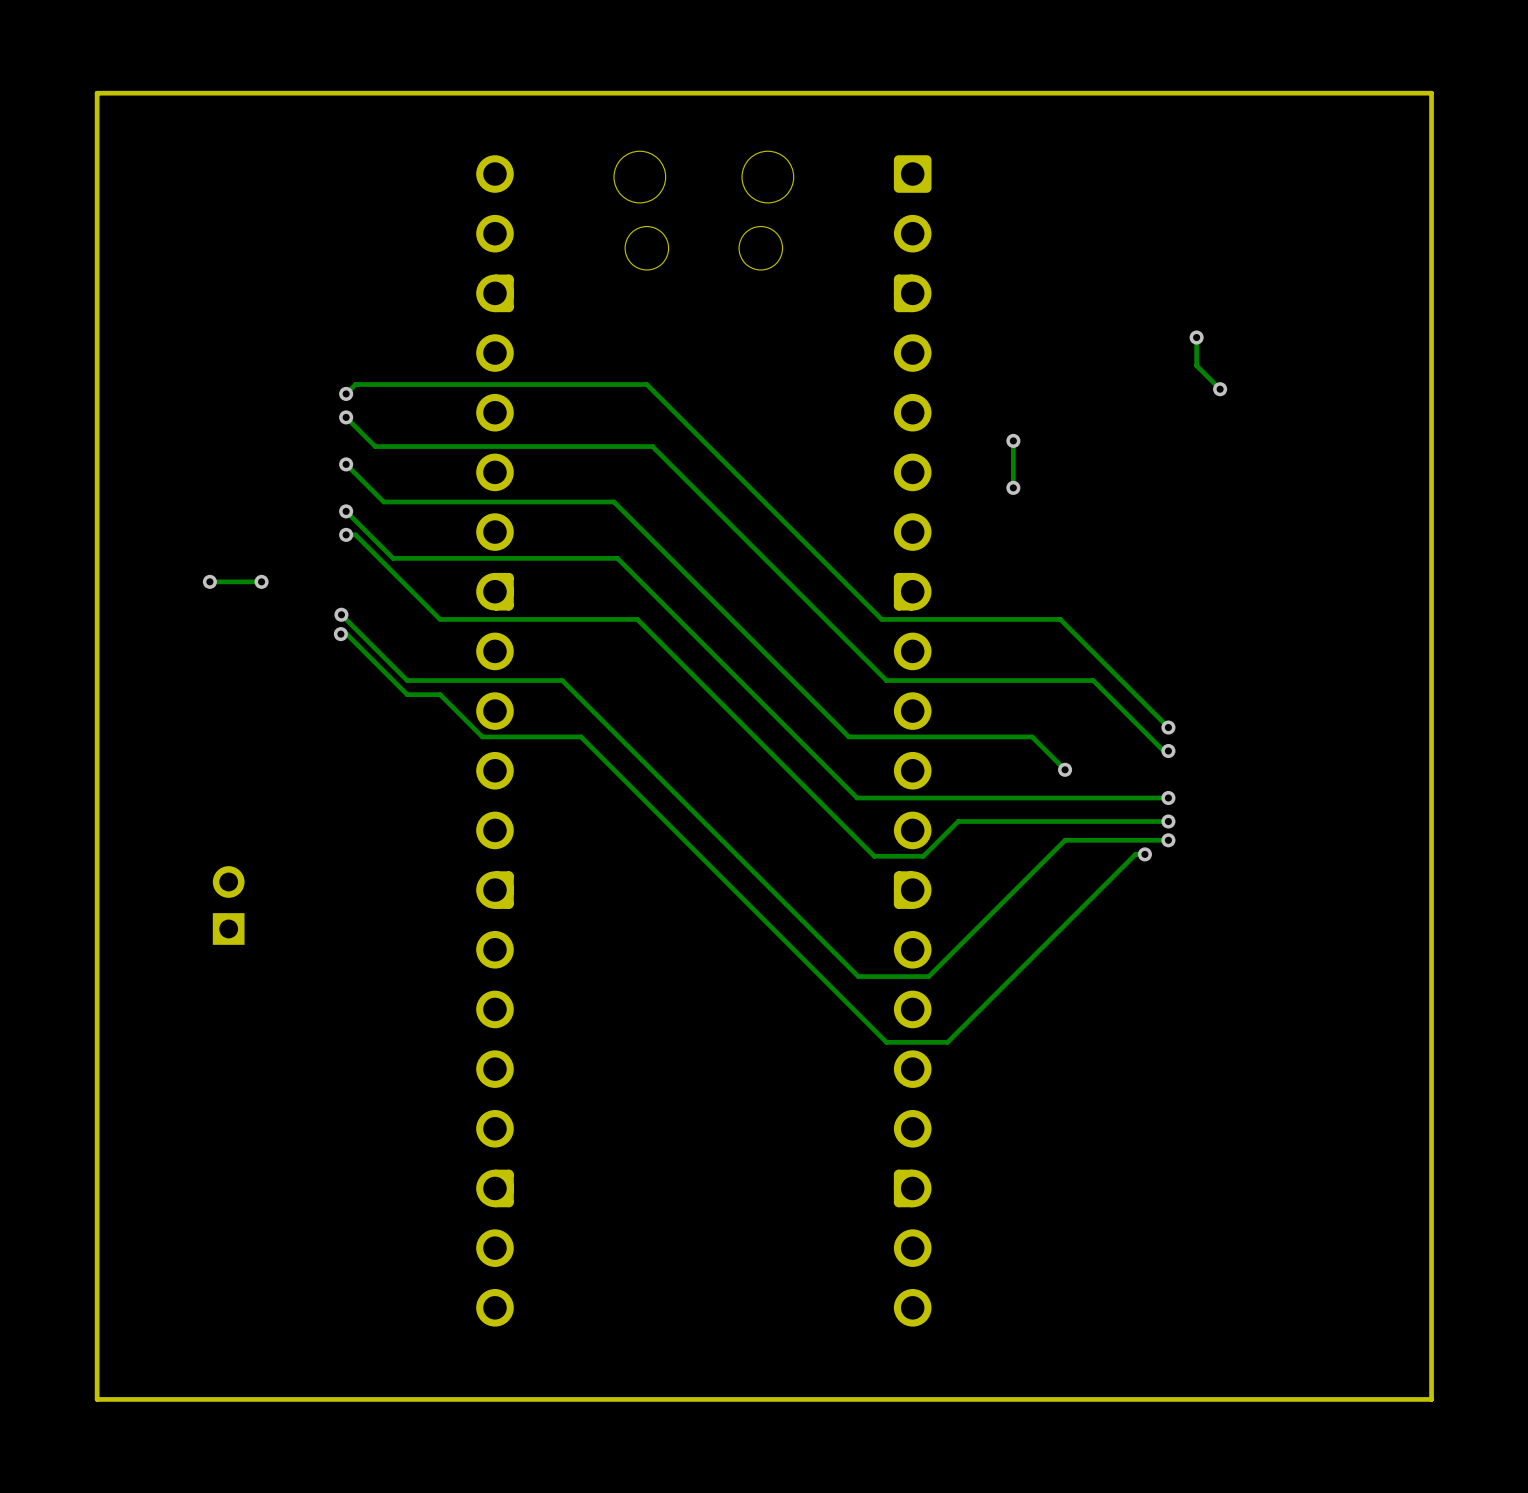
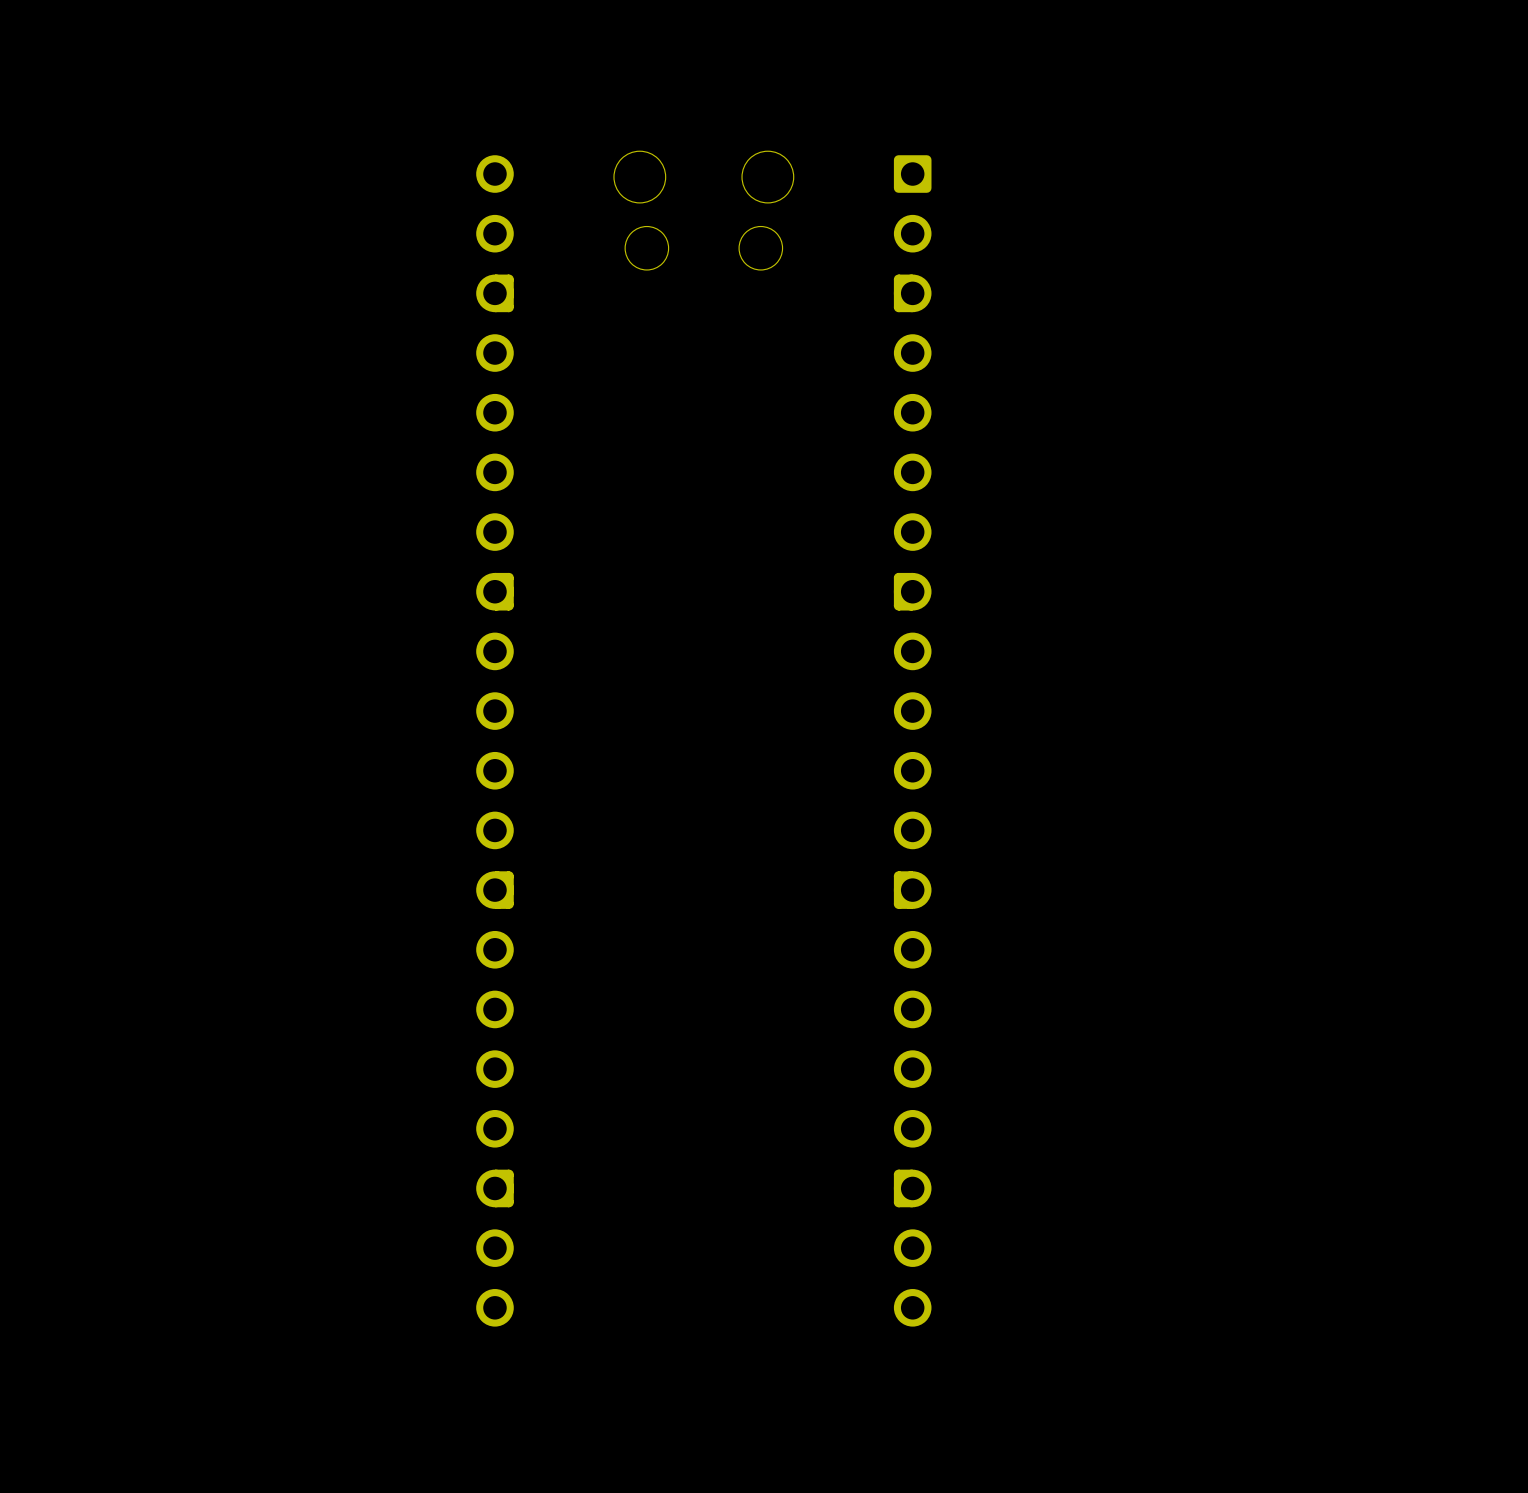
board edge: (1431, 93) (97, 93) (97, 1399) (1431, 1399) (1431, 93) -> none
track: (1196, 337) (1196, 365) (1220, 389) -> none
via: (1196, 337) -> none
via: (1220, 389) -> none
track: (346, 393) (355, 384) (646, 384) (881, 619) (1060, 619) (1168, 727) -> none
via: (346, 393) -> none
track: (346, 417) (375, 446) (652, 446) (886, 680) (1093, 680) (1163, 751) (1168, 751) -> none
via: (346, 417) -> none
track: (1013, 440) (1013, 487) -> none
via: (1013, 440) -> none
track: (346, 464) (383, 501) (613, 501) (848, 736) (1032, 736) (1065, 769) -> none
via: (346, 464) -> none
via: (1013, 487) -> none
track: (346, 511) (393, 558) (617, 558) (857, 798) (1168, 798) -> none
via: (346, 511) -> none
track: (346, 534) (355, 534) (440, 619) (637, 619) (874, 856) (923, 856) (958, 821) (1168, 821) -> none
via: (346, 534) -> none
via: (209, 581) -> none
track: (261, 581) (209, 581) -> none
via: (261, 581) -> none
track: (341, 614) (407, 680) (562, 680) (858, 976) (928, 976) (1065, 840) (1168, 840) -> none
via: (341, 614) -> none
track: (340, 634) (346, 633) (407, 694) (440, 694) (482, 736) (581, 736) (886, 1042) (947, 1042) (1135, 854) (1144, 854) -> none
via: (340, 634) -> none
via: (1168, 727) -> none
via: (1168, 751) -> none
via: (1065, 769) -> none
via: (1168, 798) -> none
via: (1168, 821) -> none
via: (1168, 840) -> none
via: (1144, 854) -> none
part: (228, 905) -> none

